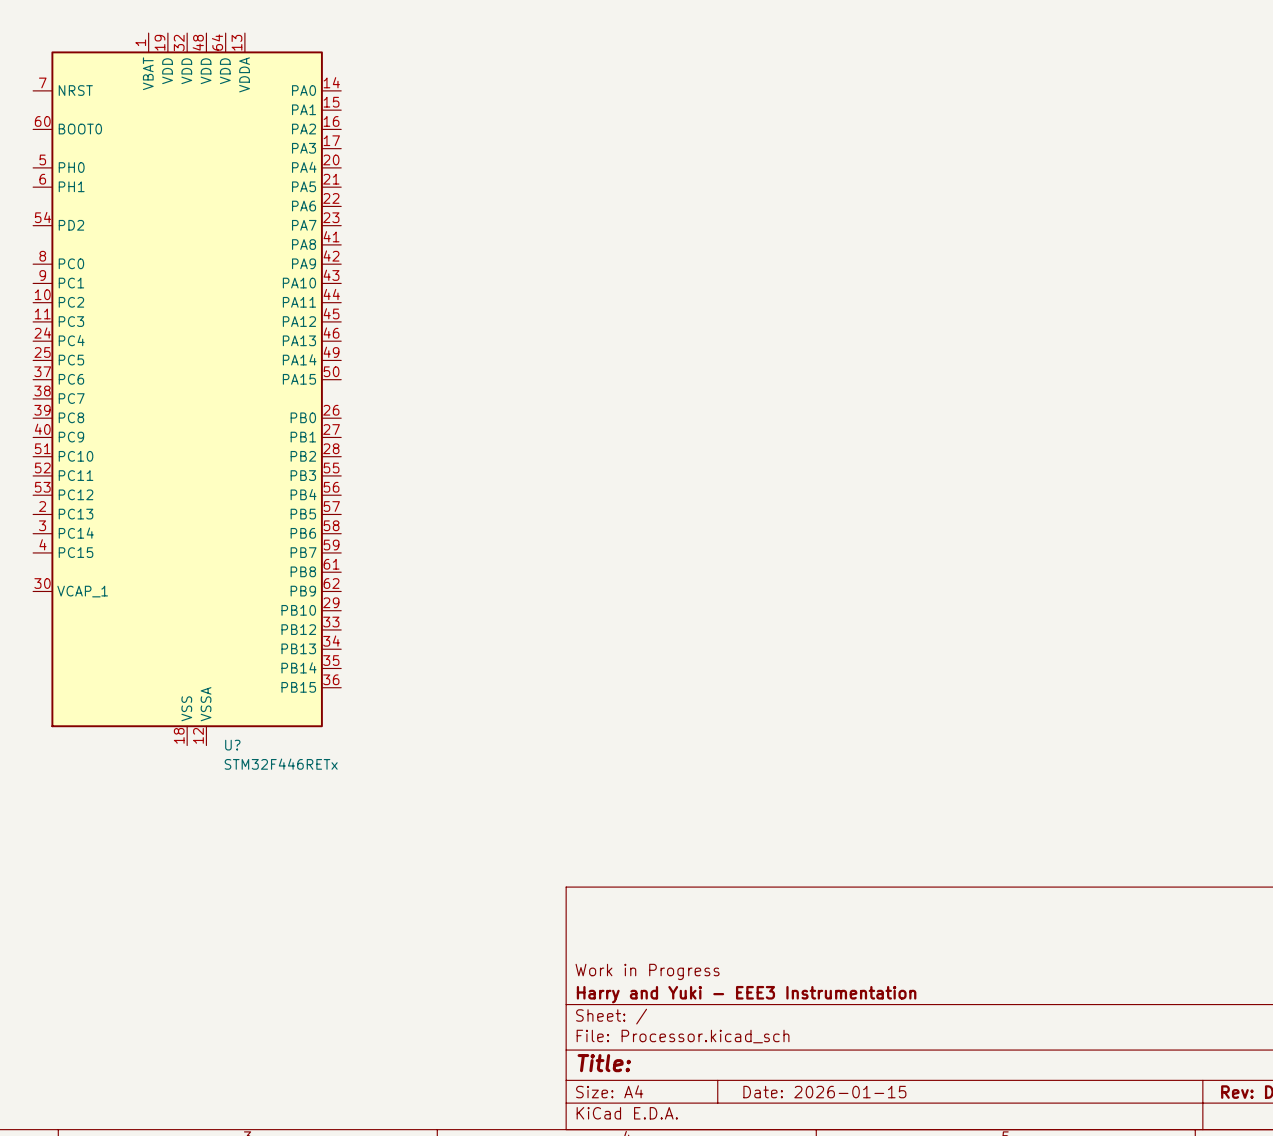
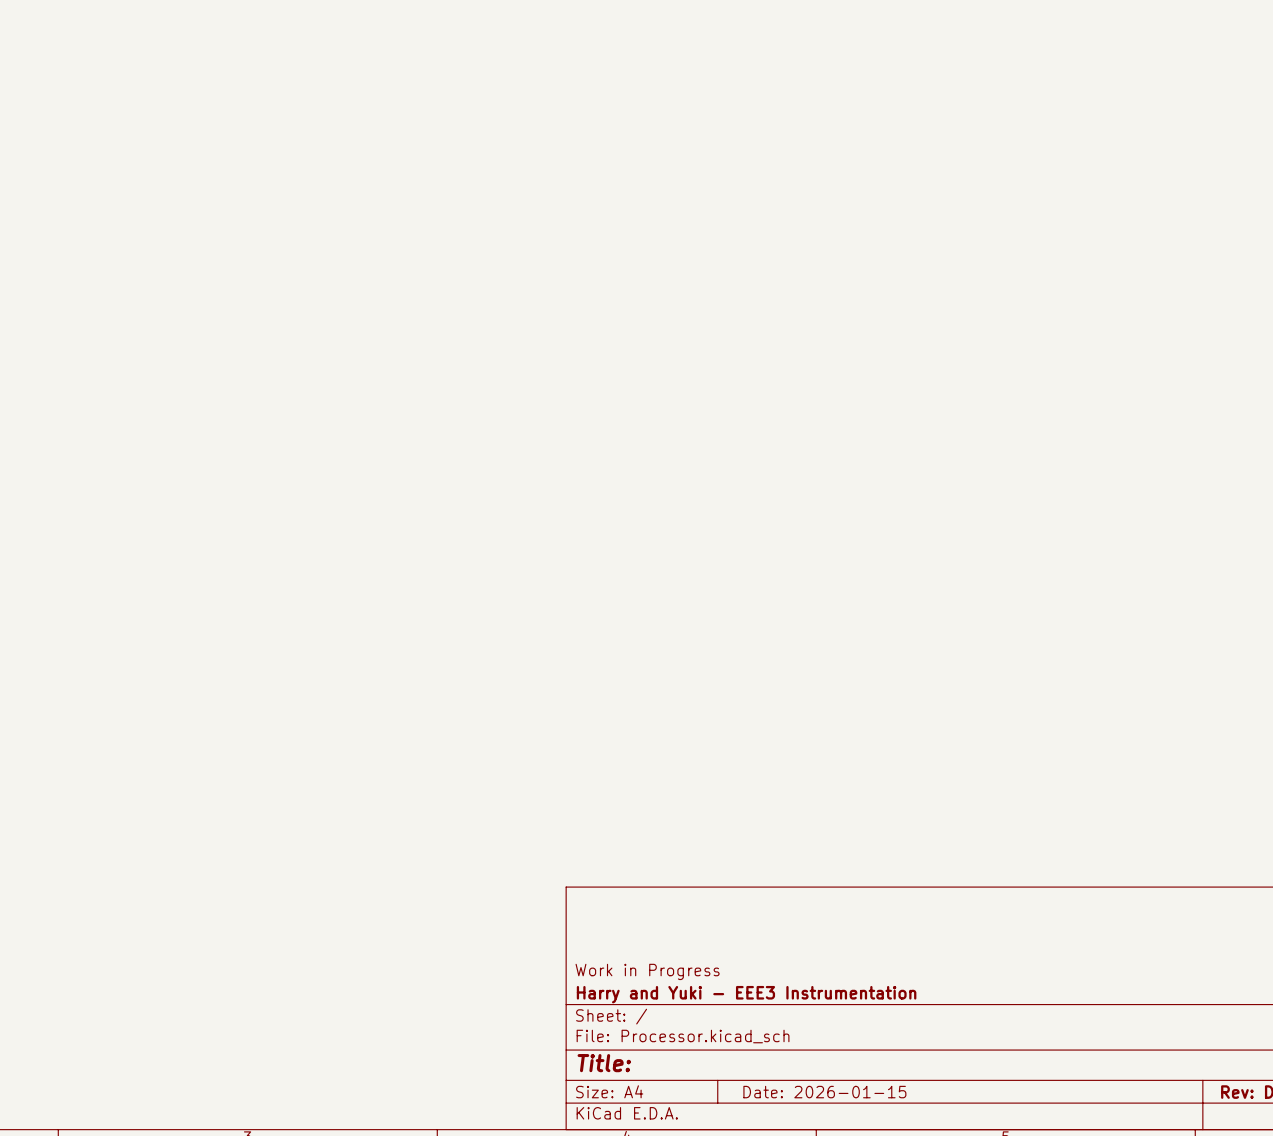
U?: STM32F446RETx (187, 389) -> none

